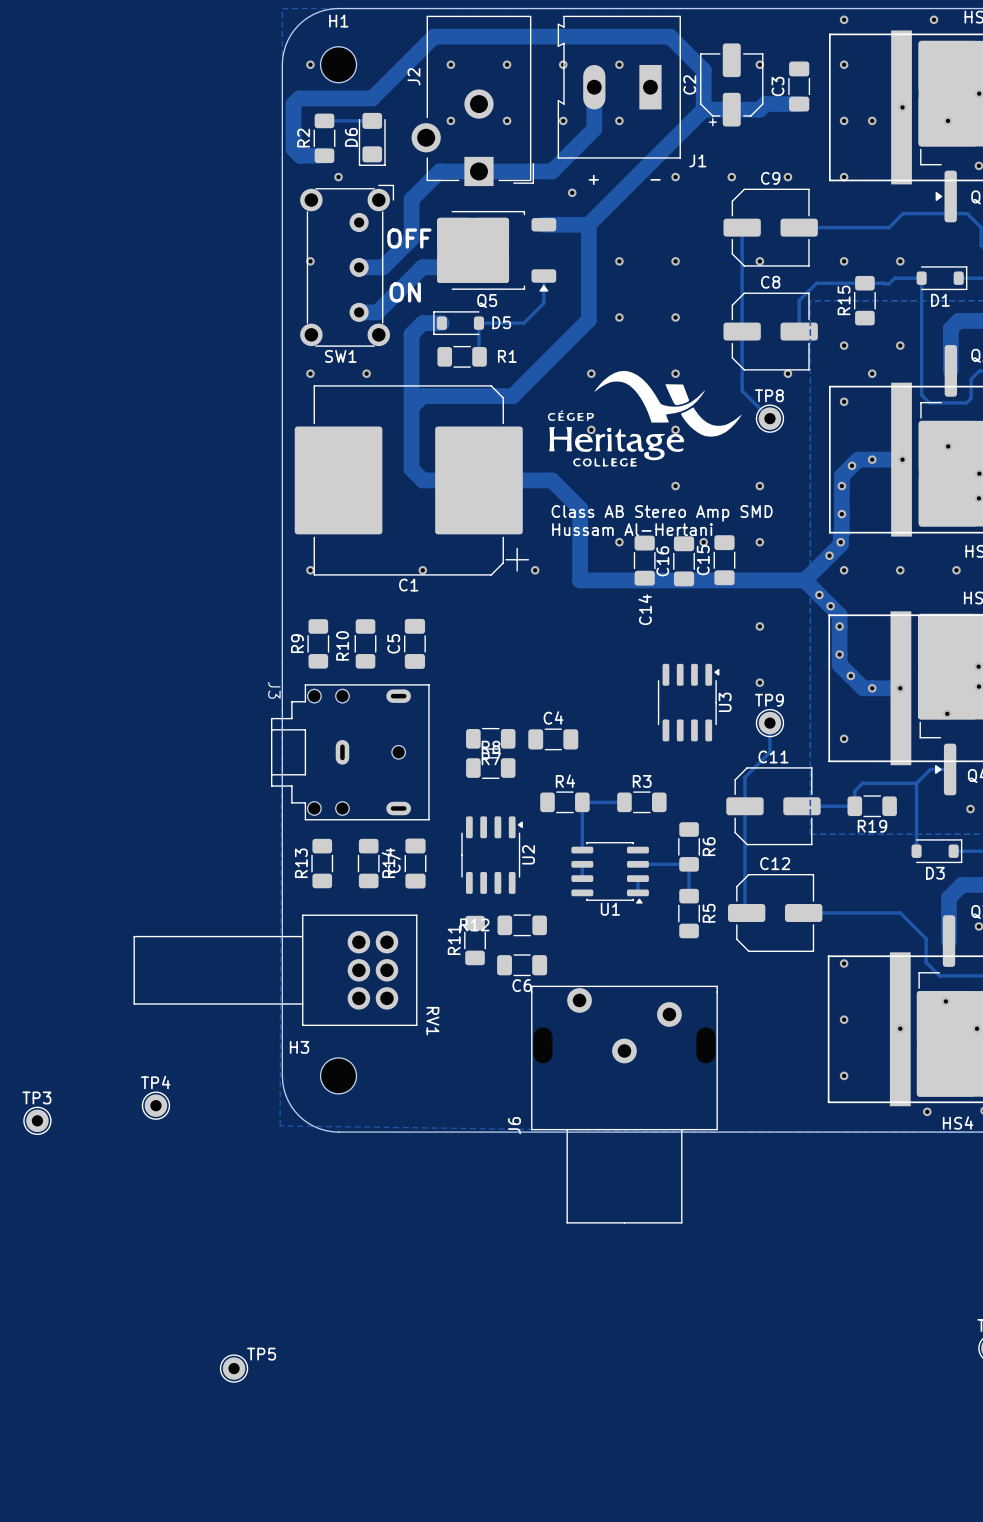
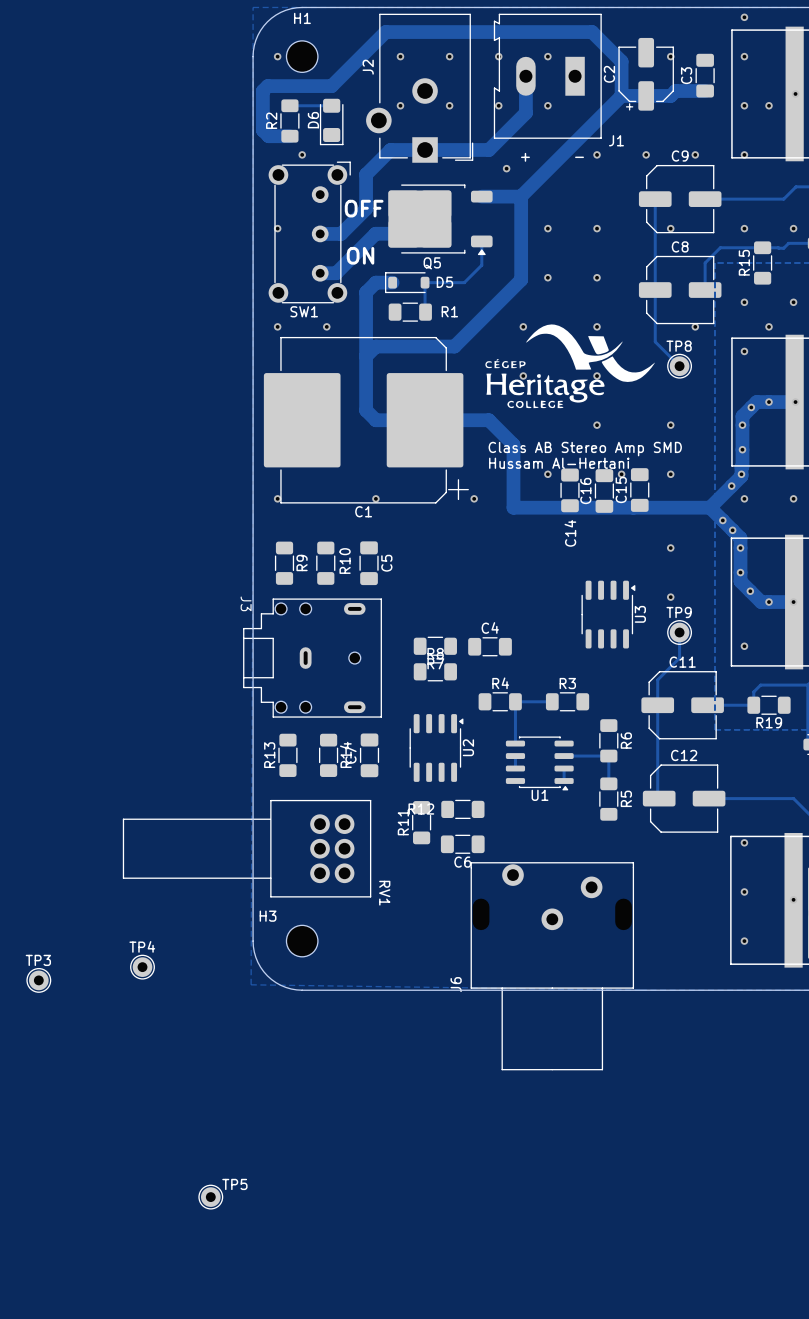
R9 name position: R9 (297, 643) -> R9 (302, 562)
C5 name position: C5 (393, 643) -> C5 (386, 563)
R10 name position: R10 (342, 645) -> R10 (345, 561)

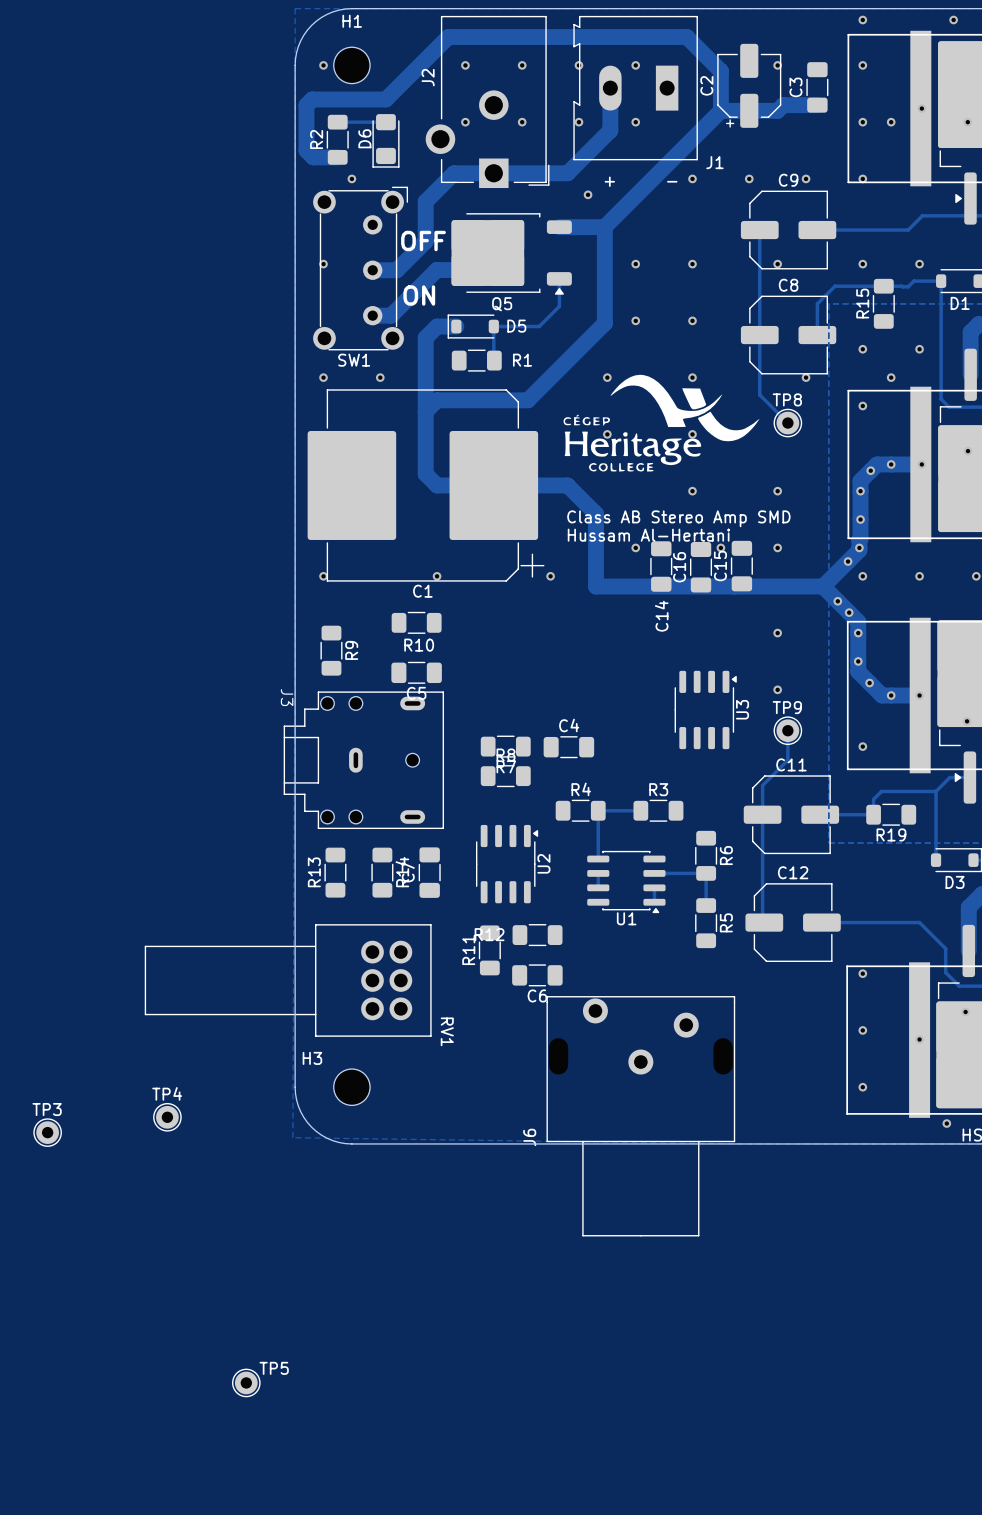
R10 rotation: 0° (325, 563) -> 90° clockwise (416, 622)
R10 position: (325, 563) -> (416, 622)
C5 rotation: 0° (369, 563) -> 90° clockwise (416, 672)

